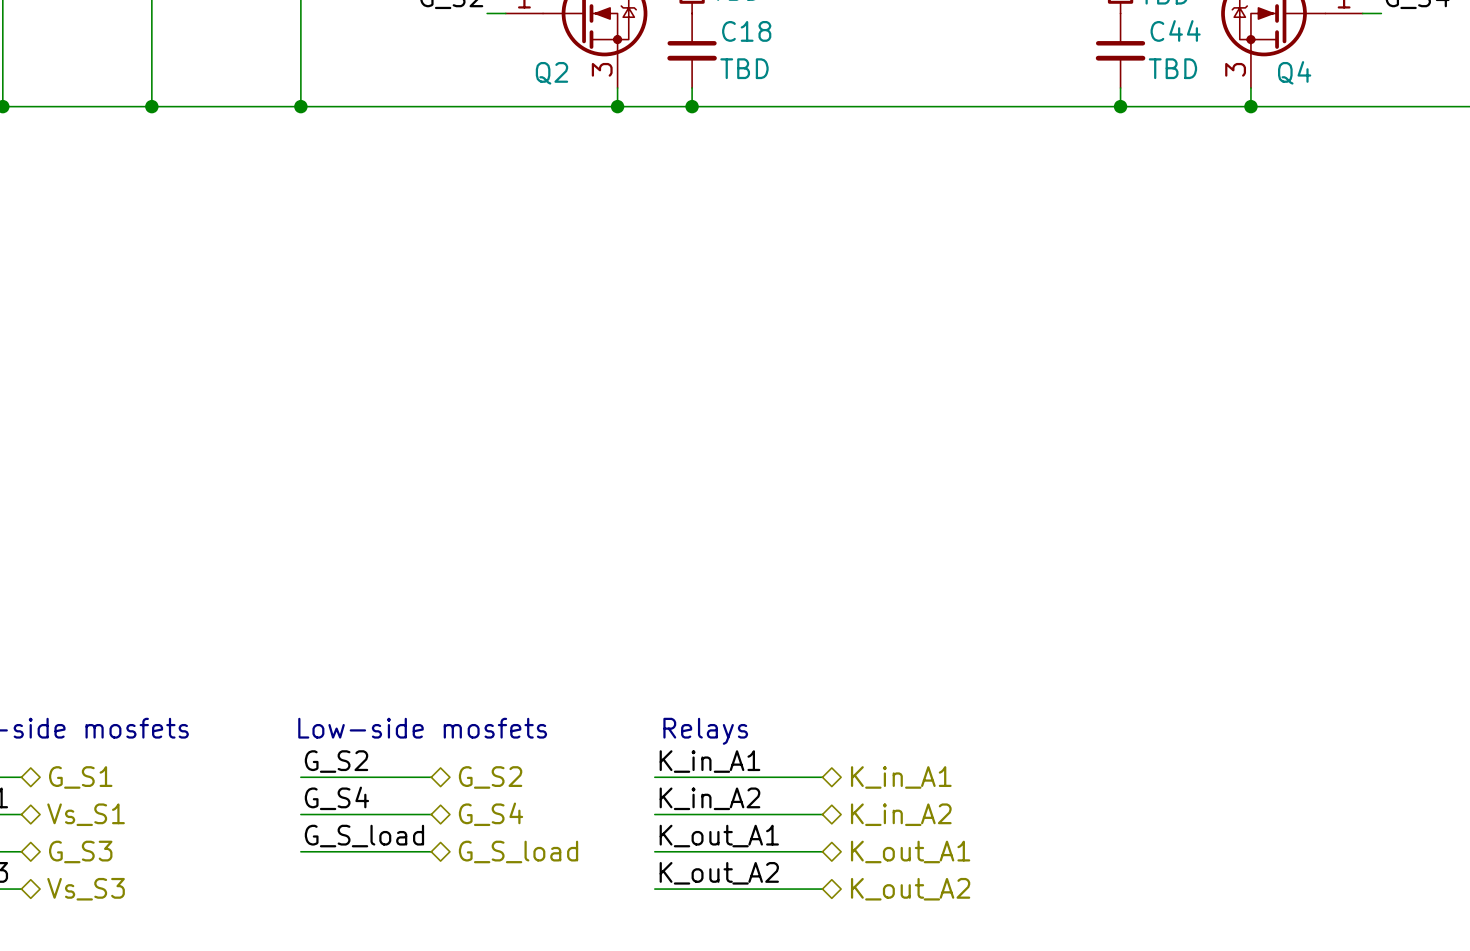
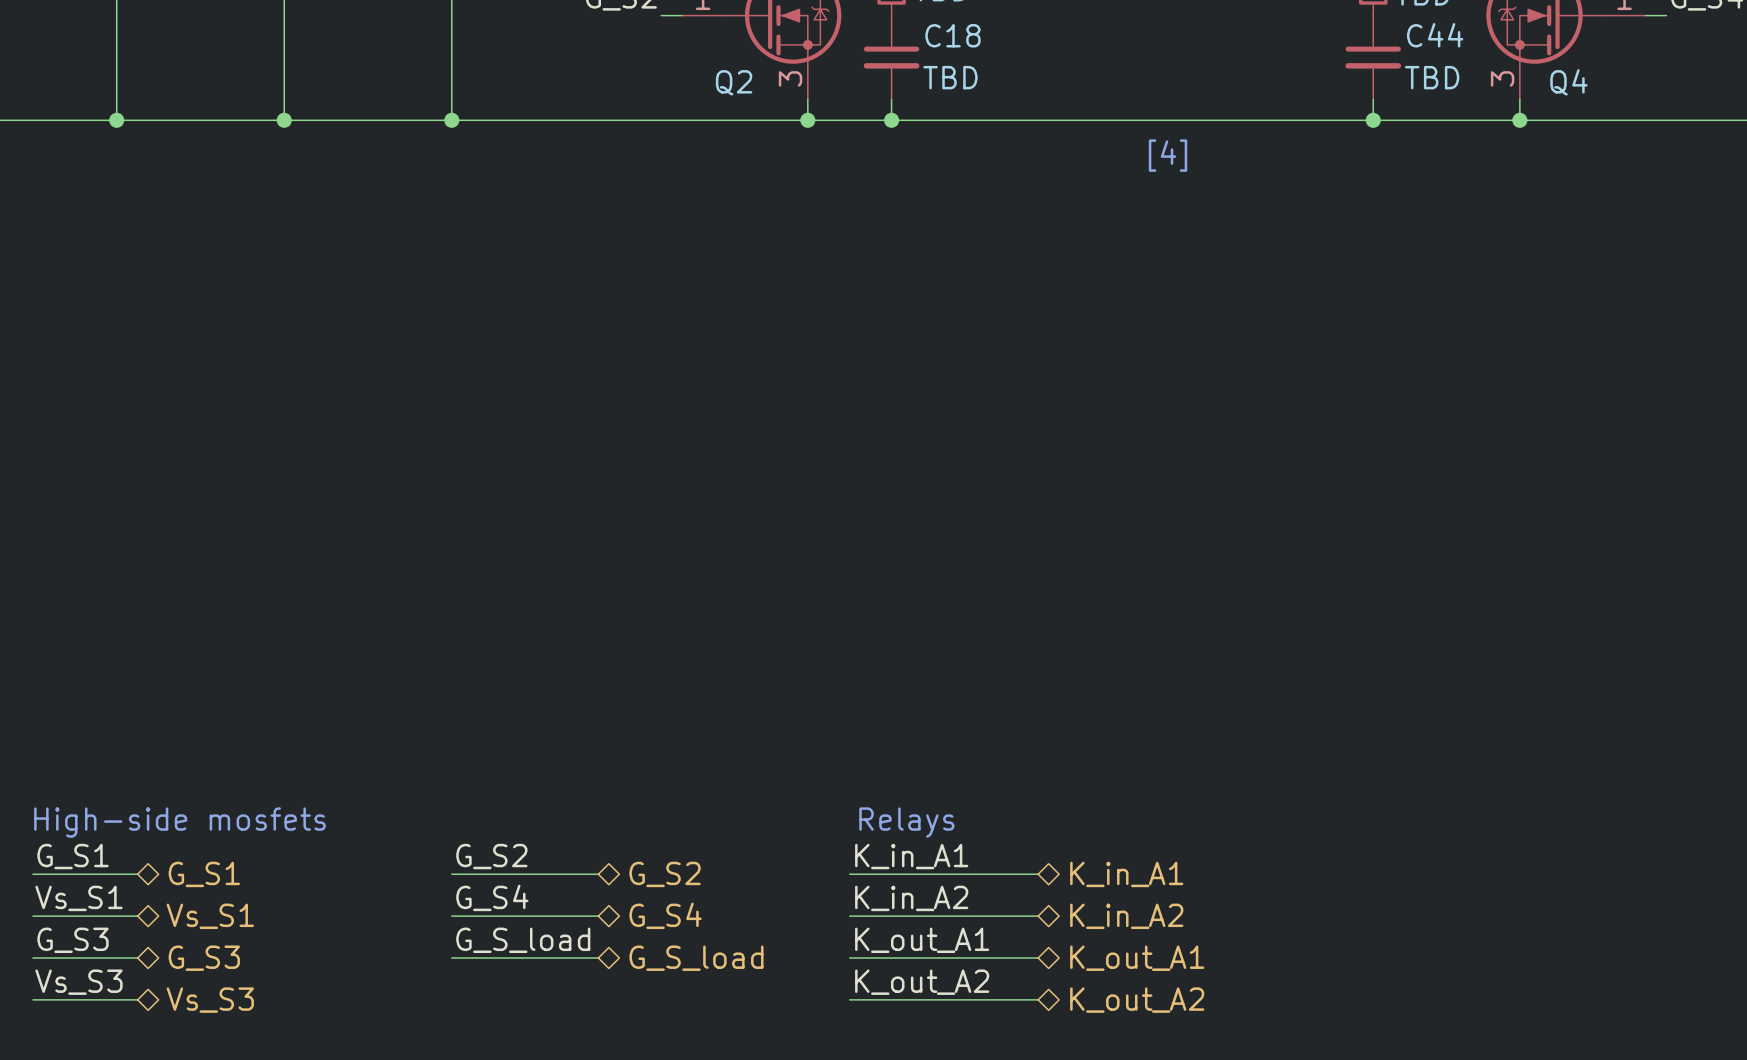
text: none -> [4] (1168, 155)
text: Low-side mosfets (422, 728) -> none

